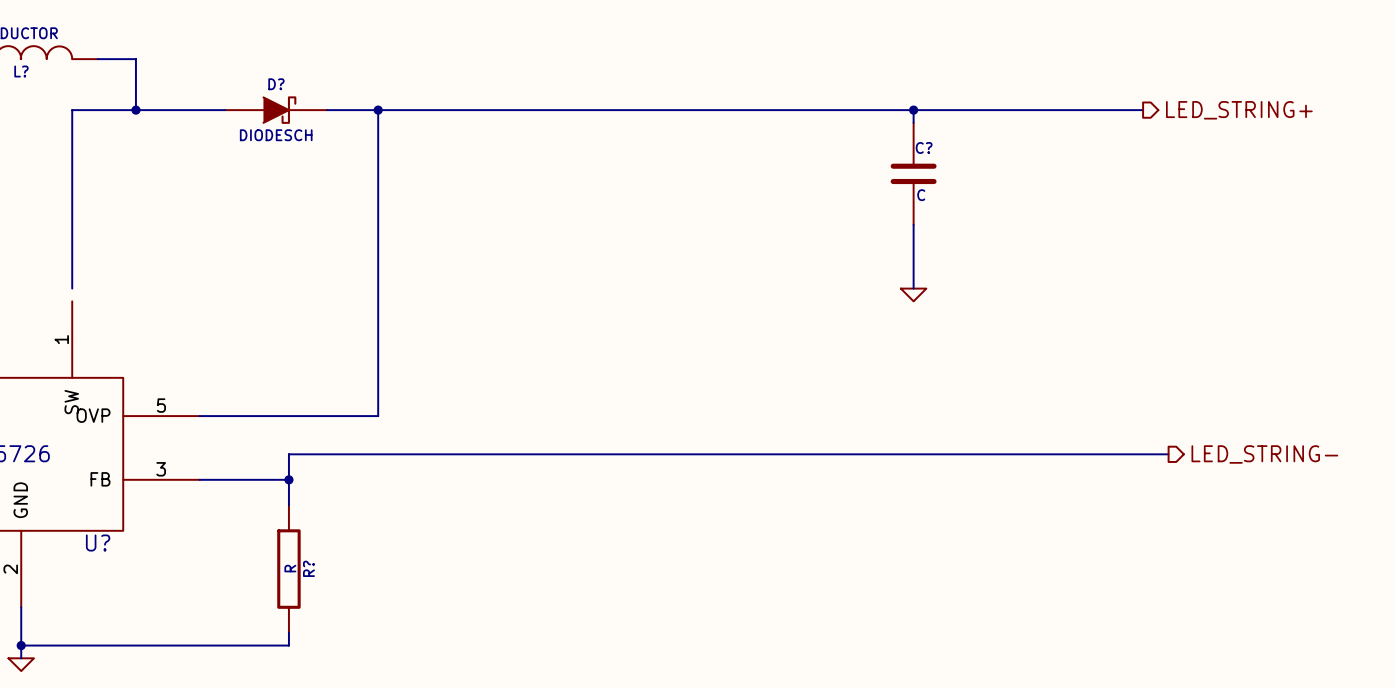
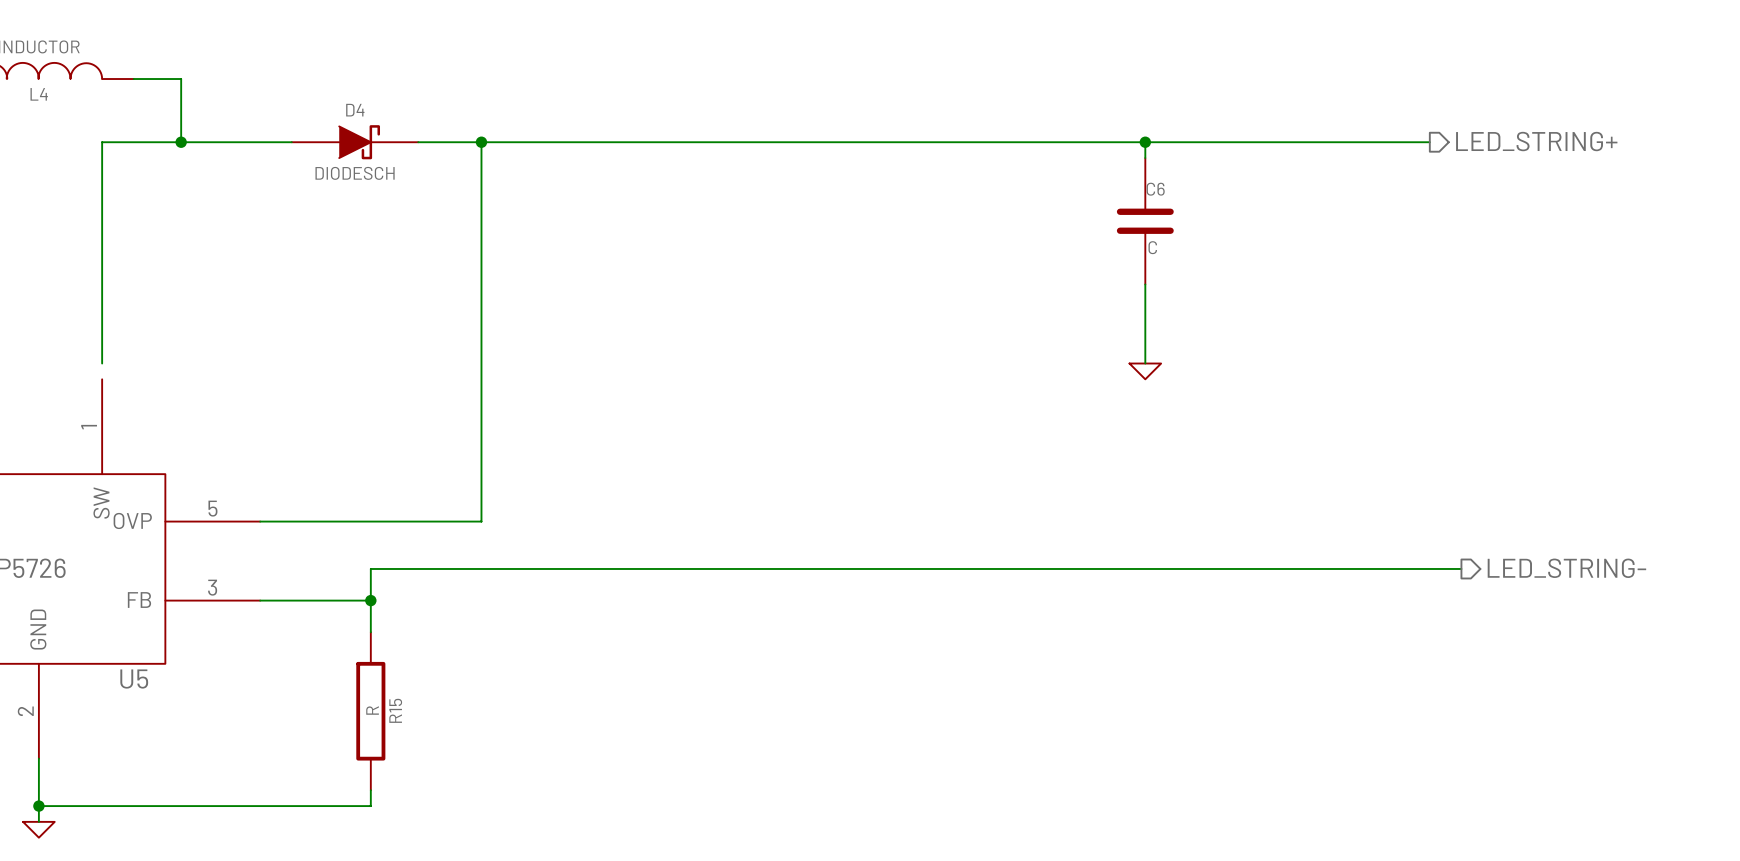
L? name: L? (21, 71) -> L4 (39, 94)
D? name: D? (276, 84) -> D4 (355, 110)
C? name: C? (924, 147) -> C6 (1155, 189)
U? name: U? (98, 542) -> U5 (134, 679)
R? name: R? (308, 568) -> R15 (395, 710)

